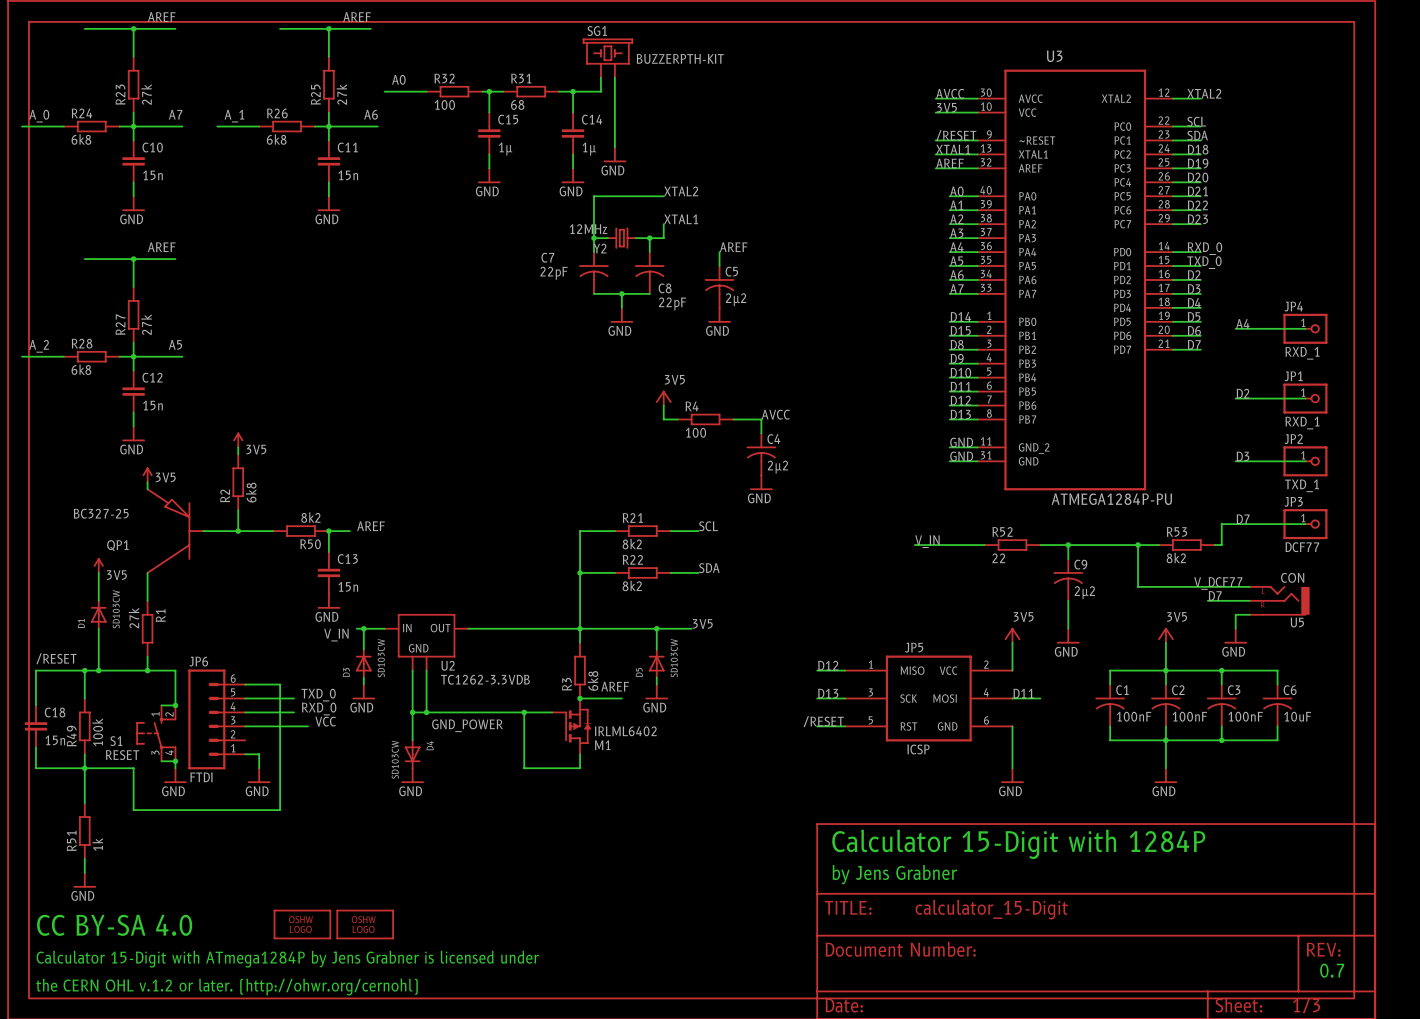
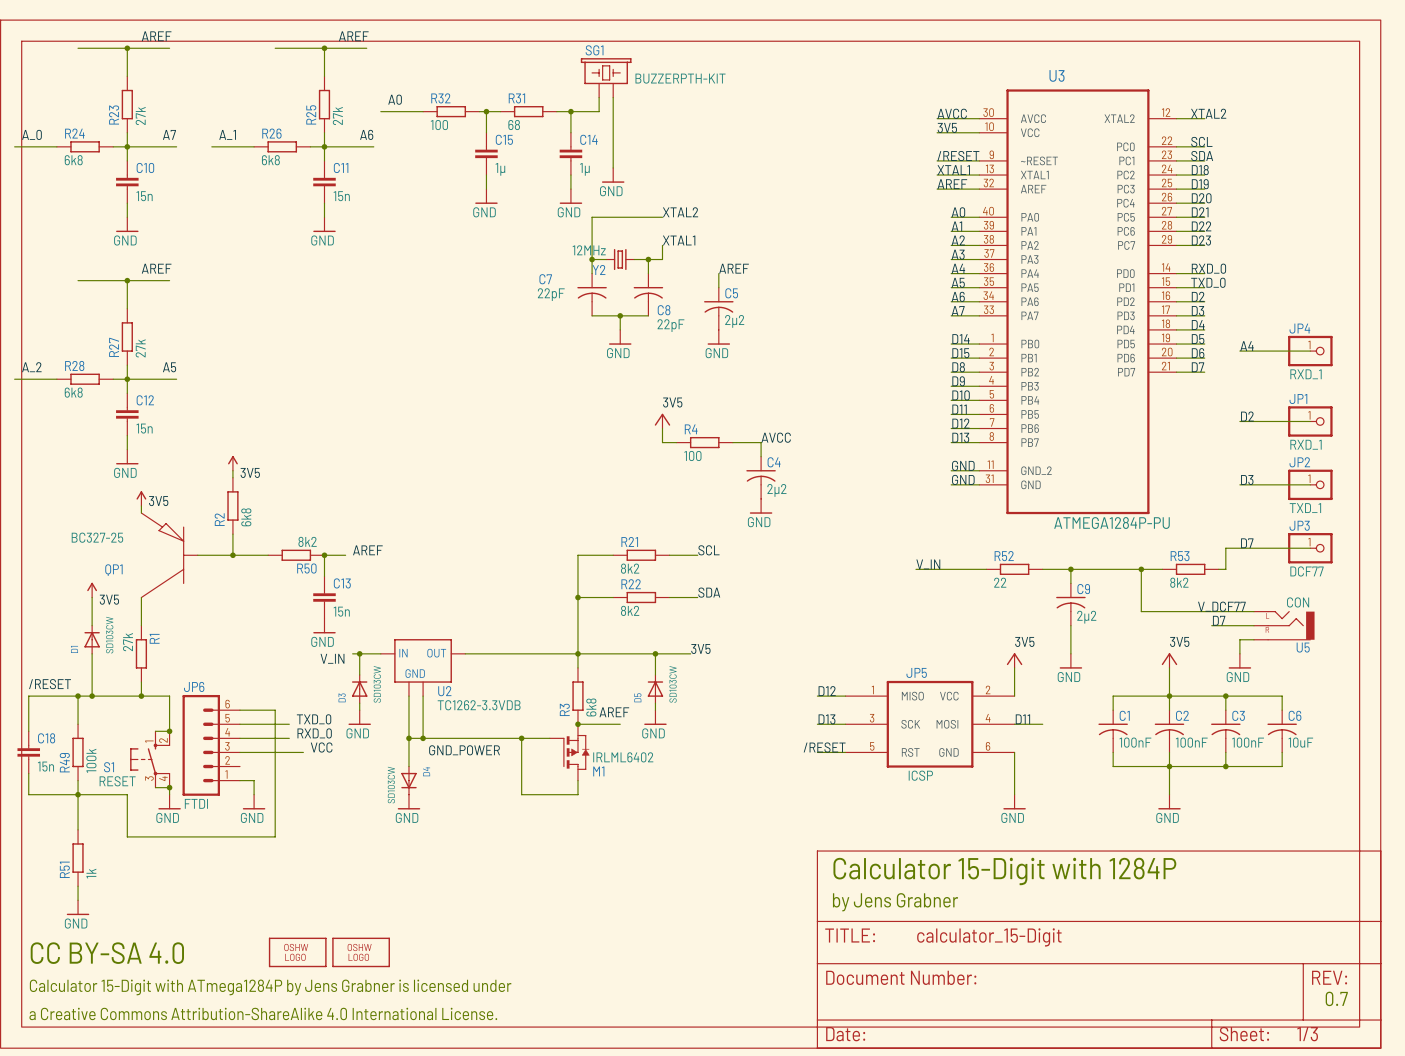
text: the CERN OHL v.1.2 or later. (http://ohwr.org/cernohl) (227, 987) -> a Creative Commons Attribution-ShareAlike 4.0 International License. (263, 1013)

